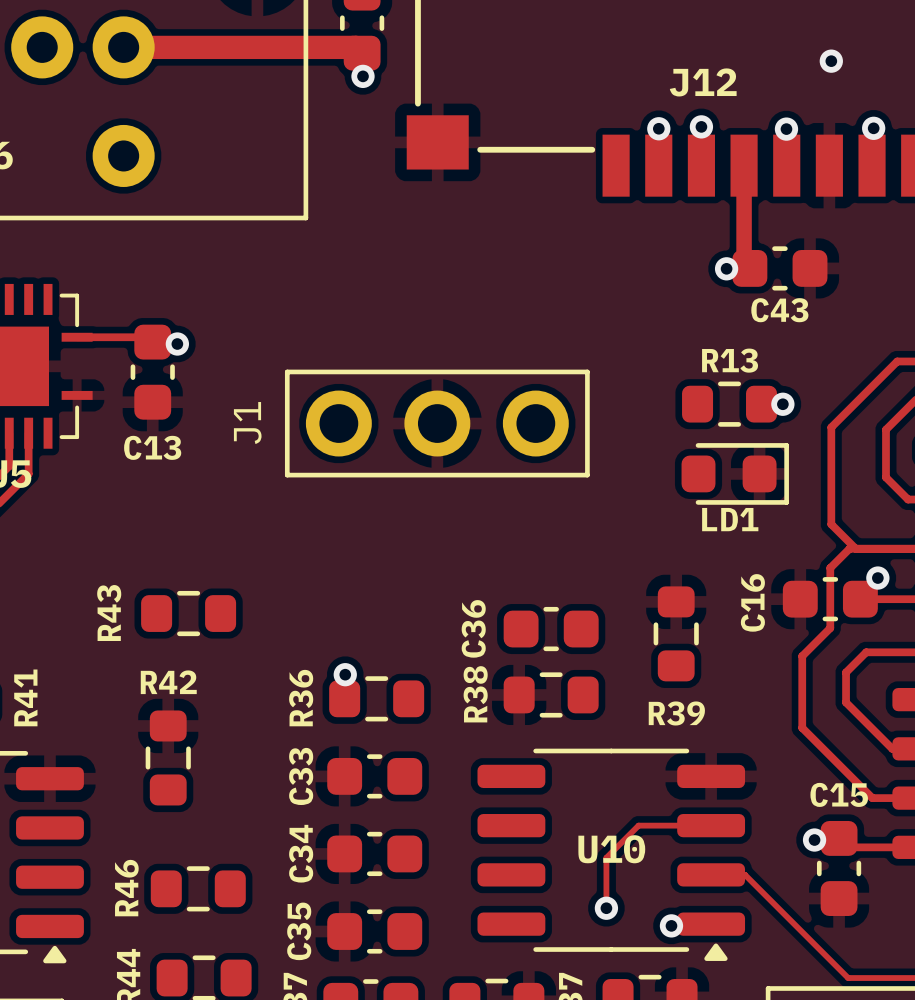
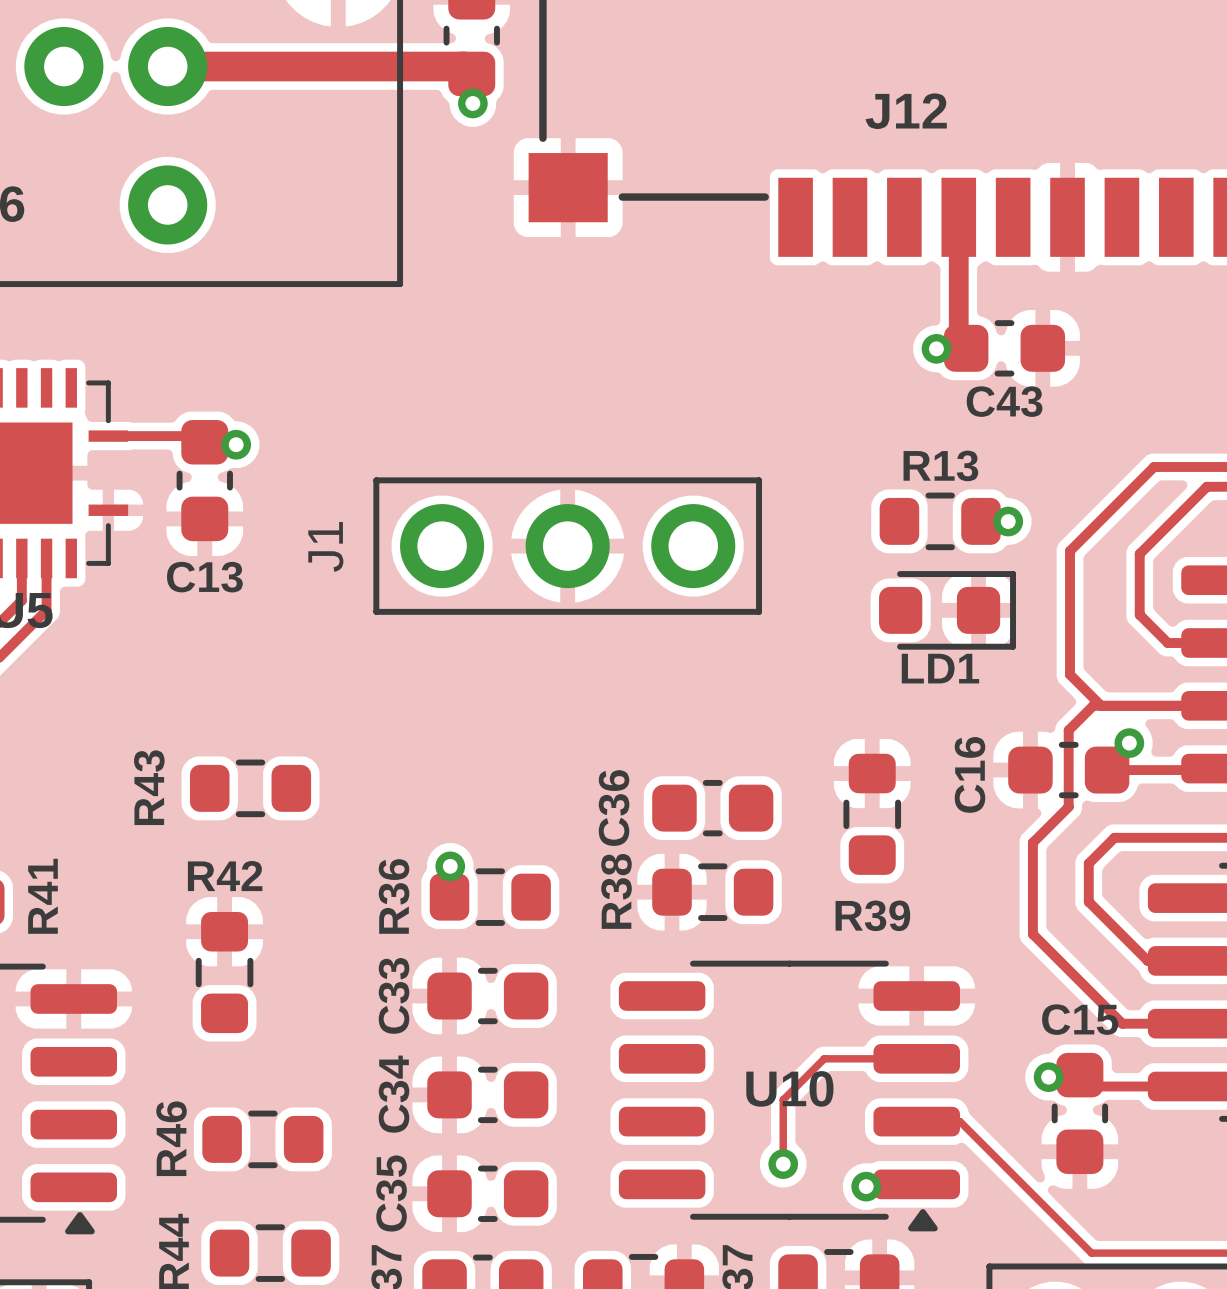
via: (831, 61) -> none
via: (701, 126) -> none
via: (658, 128) -> none
via: (873, 128) -> none
via: (786, 129) -> none

